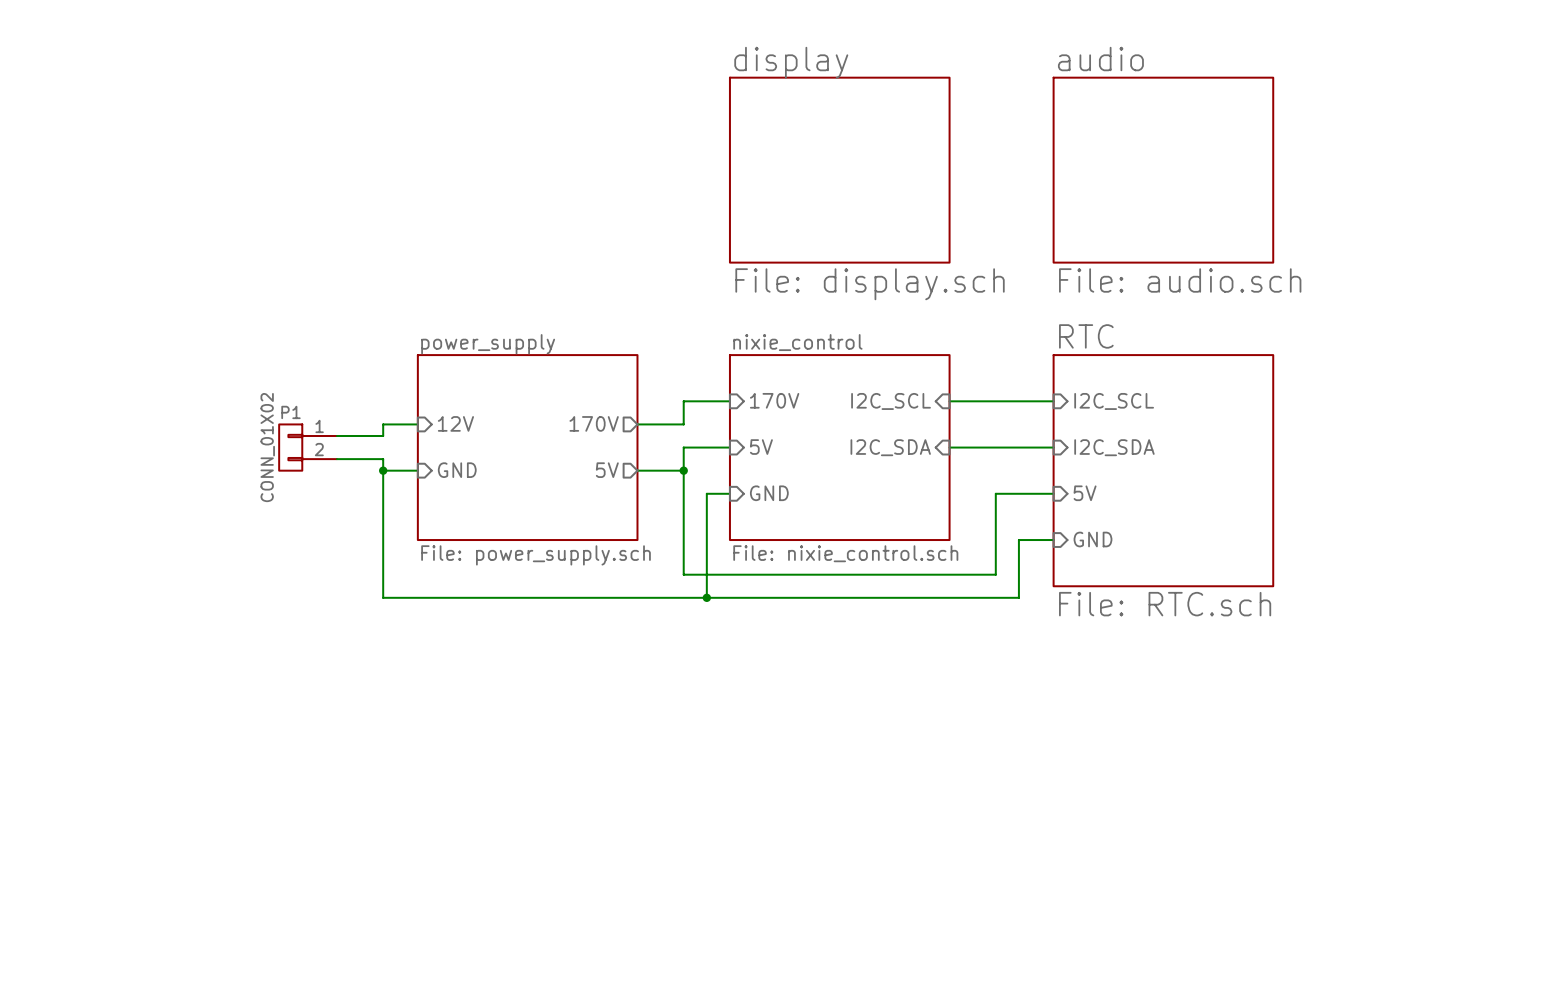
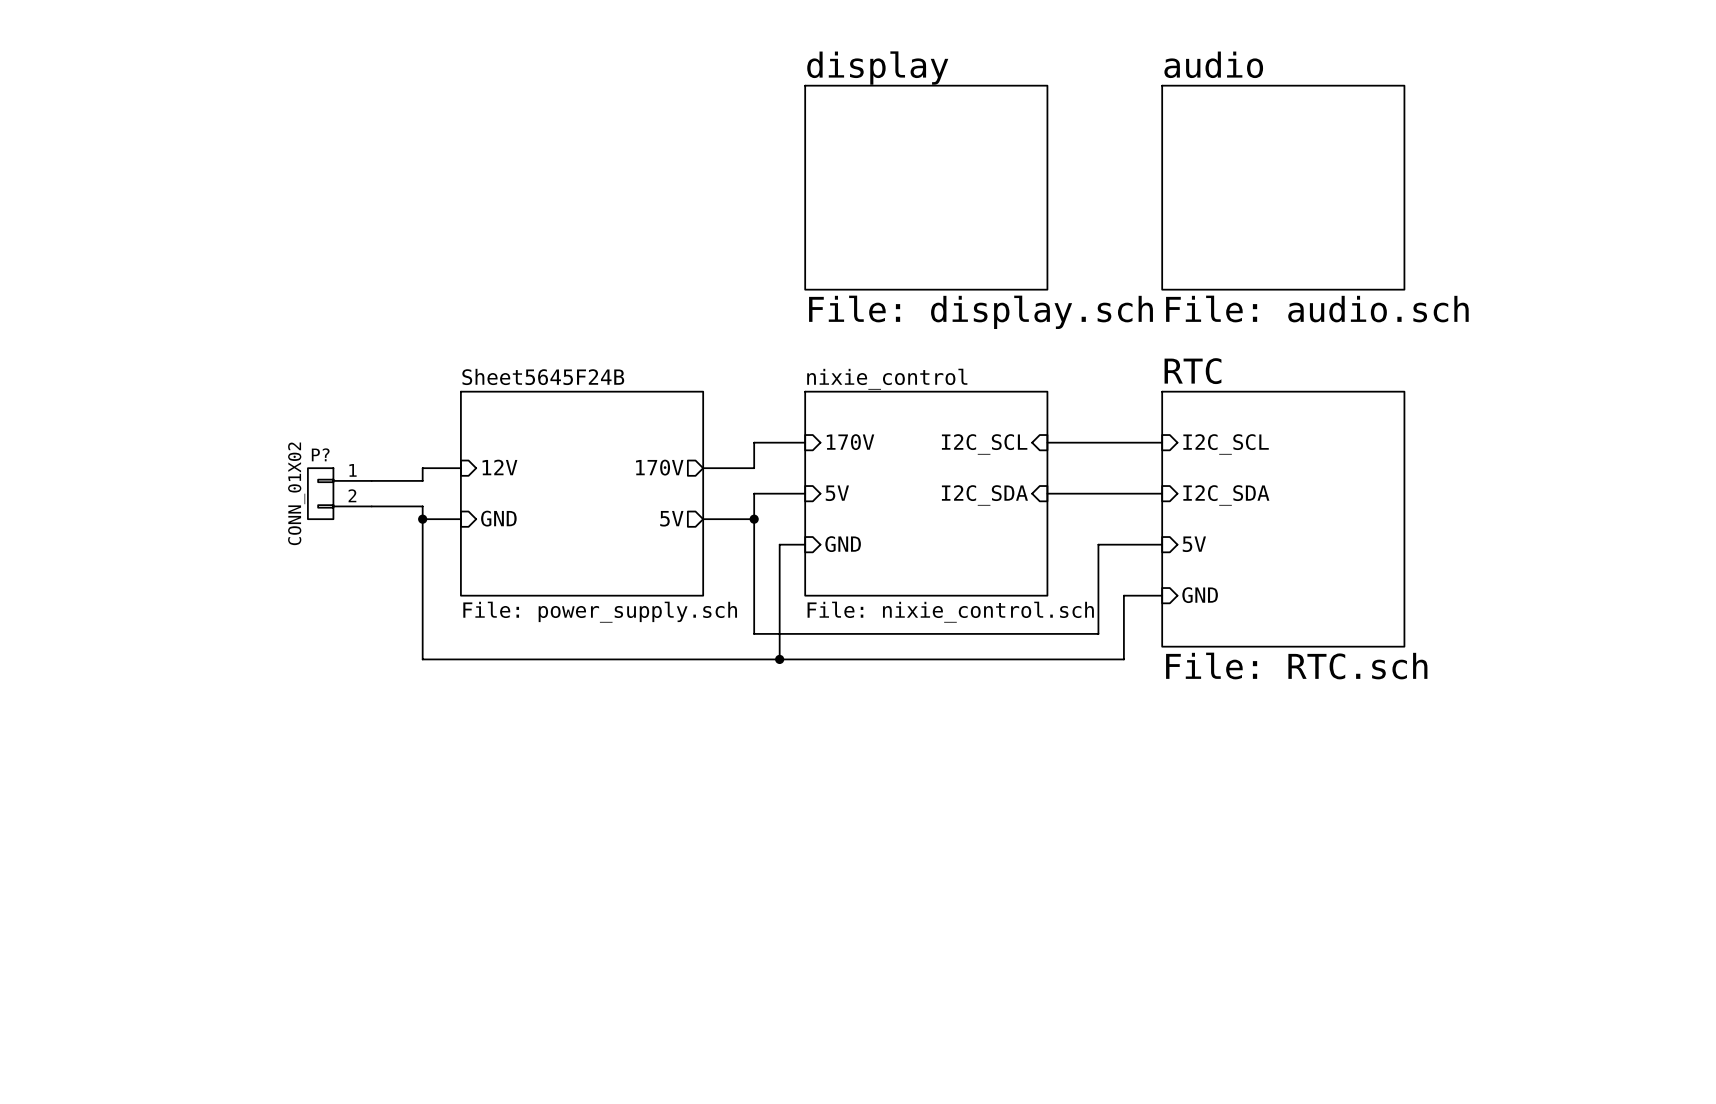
sheet power_supply name: power_supply (488, 344) -> Sheet5645F24B (543, 376)
P1 name: P1 (290, 412) -> P? (320, 454)

